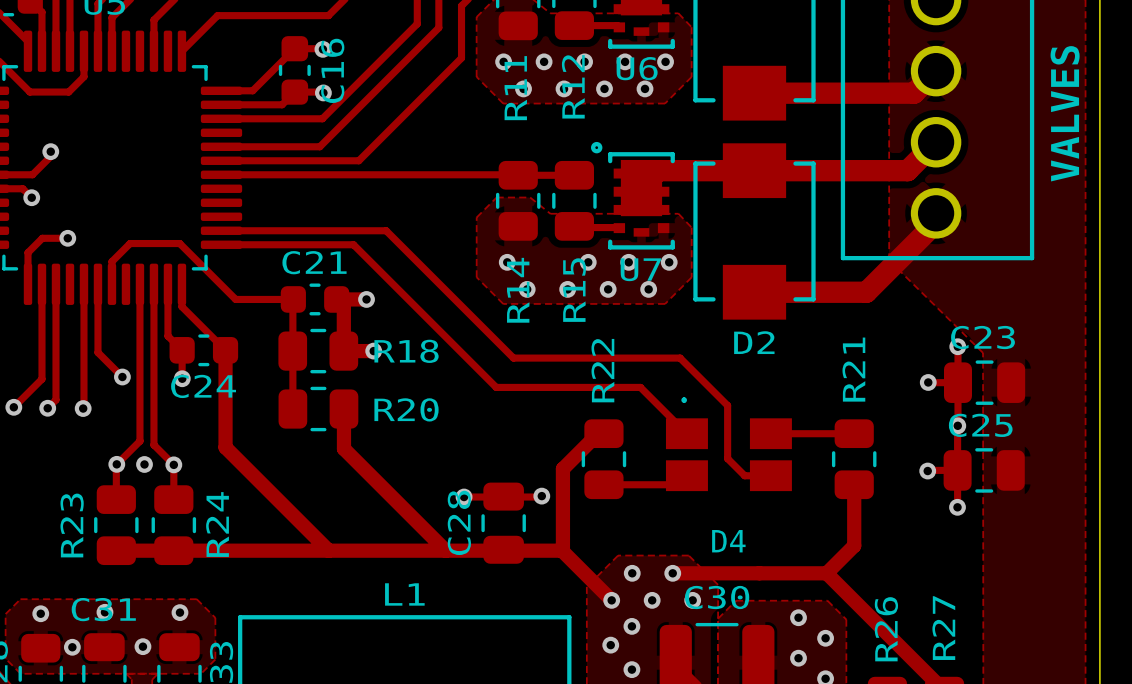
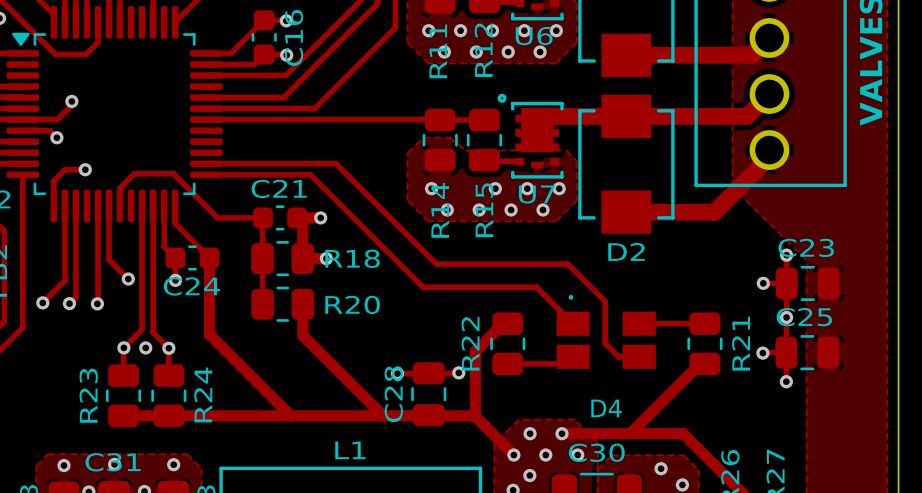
R21 name position: R21 (853, 369) -> R21 (741, 343)
R22 name position: R22 (602, 370) -> R22 (470, 343)
track: none -> (703, 360) (630, 433)
track: (854, 484) (854, 545) (826, 573) -> none

